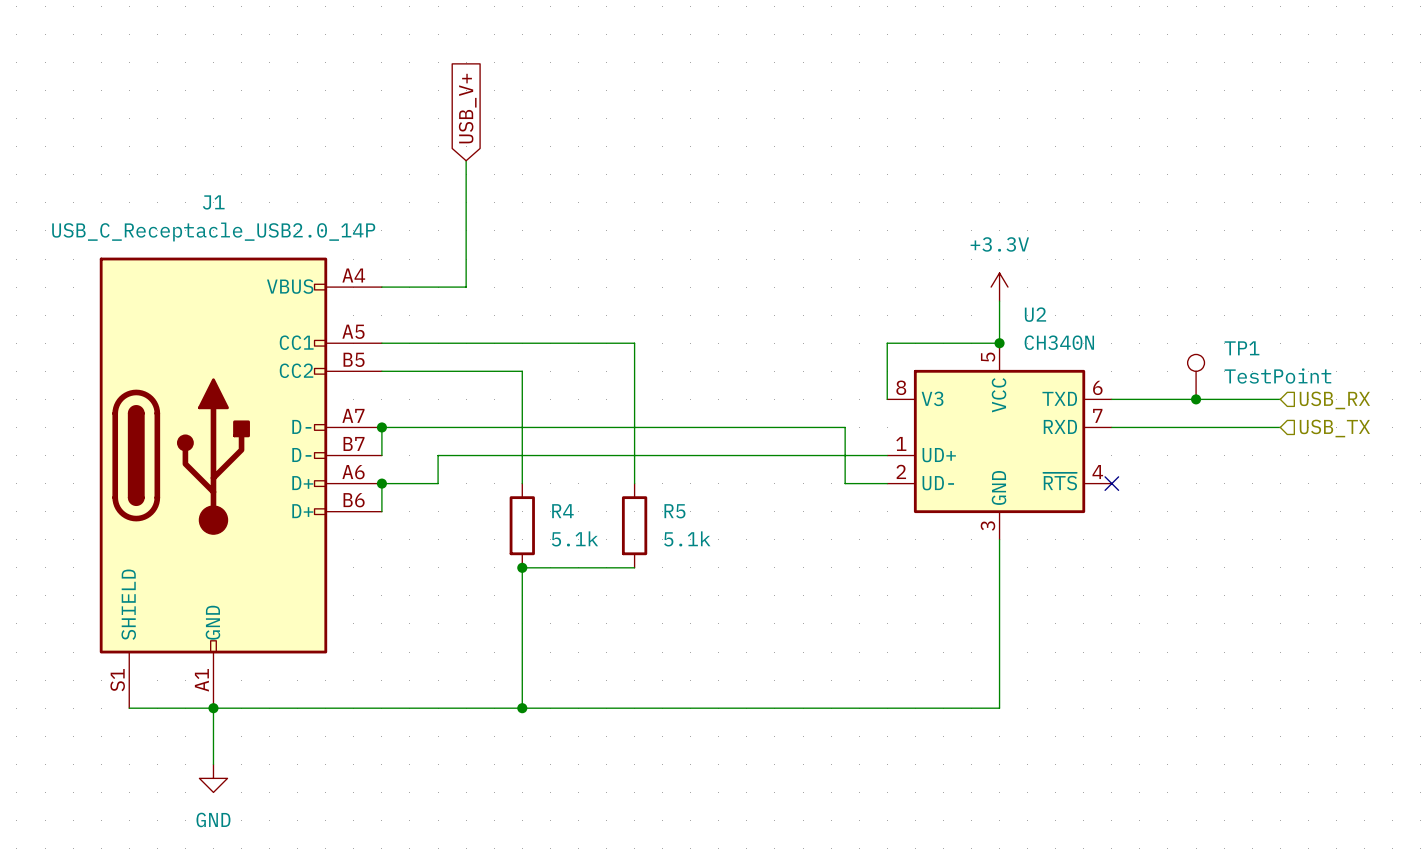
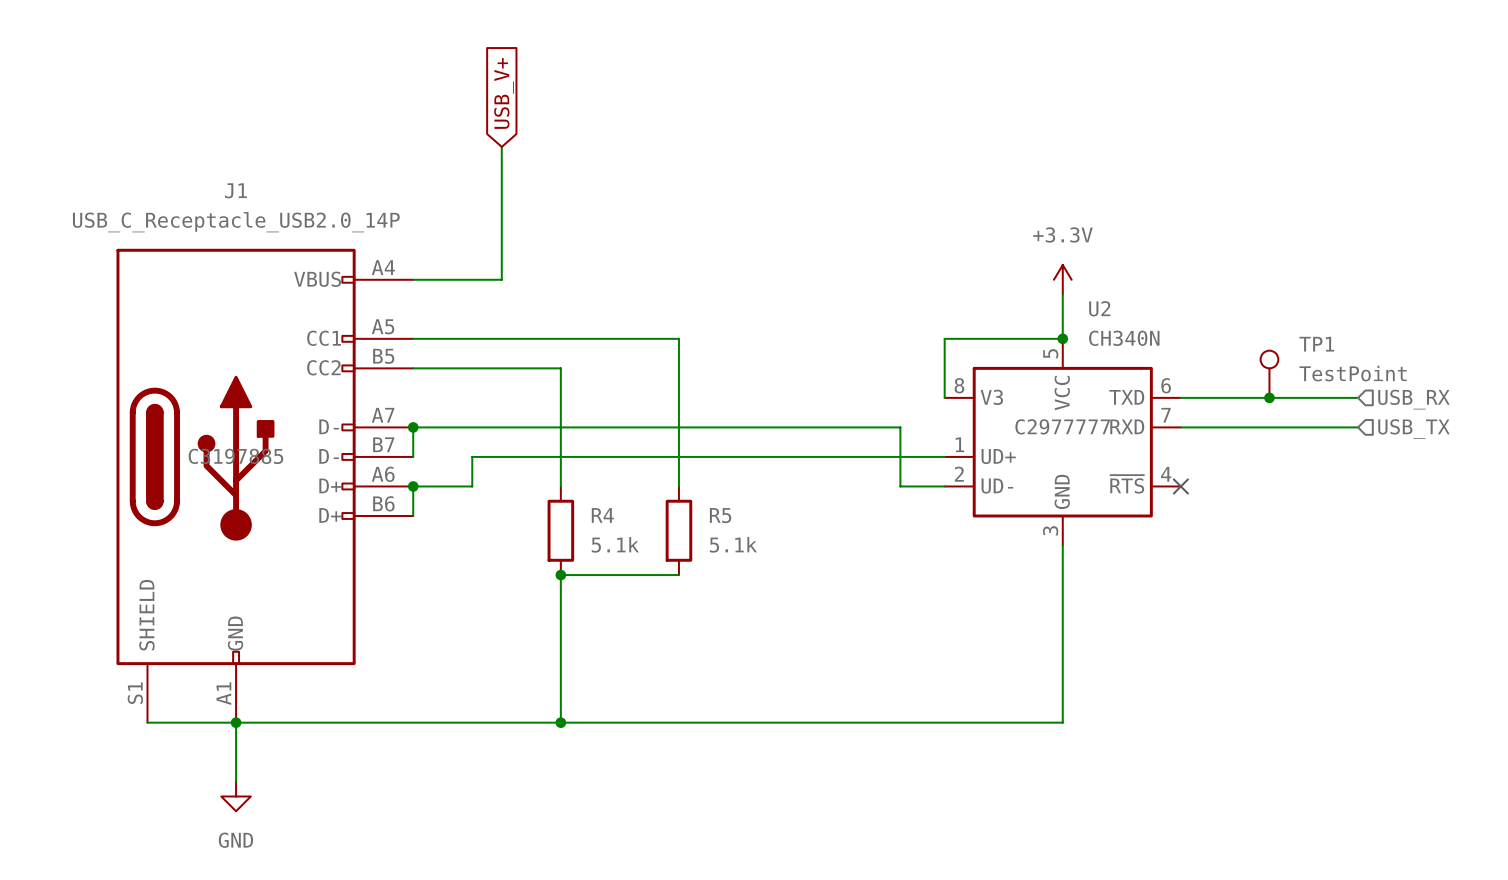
U2 text: none -> C2977777 (1062, 426)
J1 text: none -> C3197885 (235, 456)

